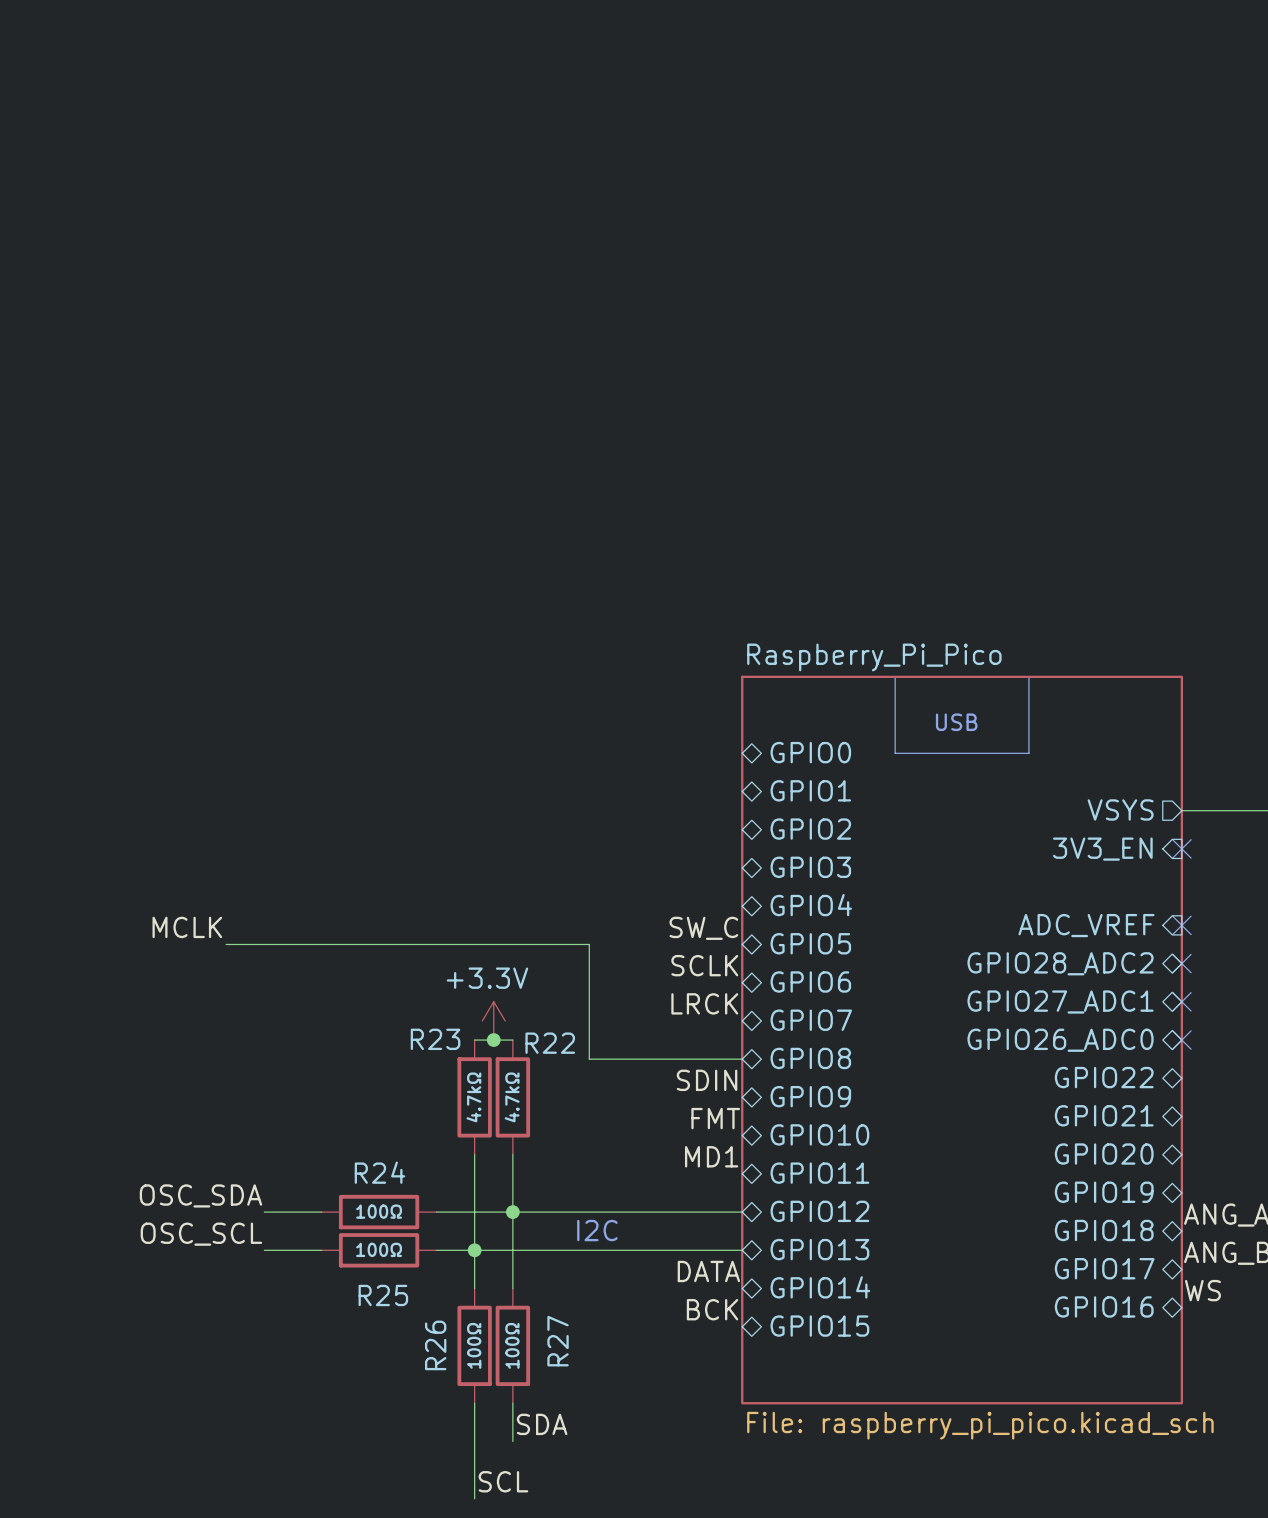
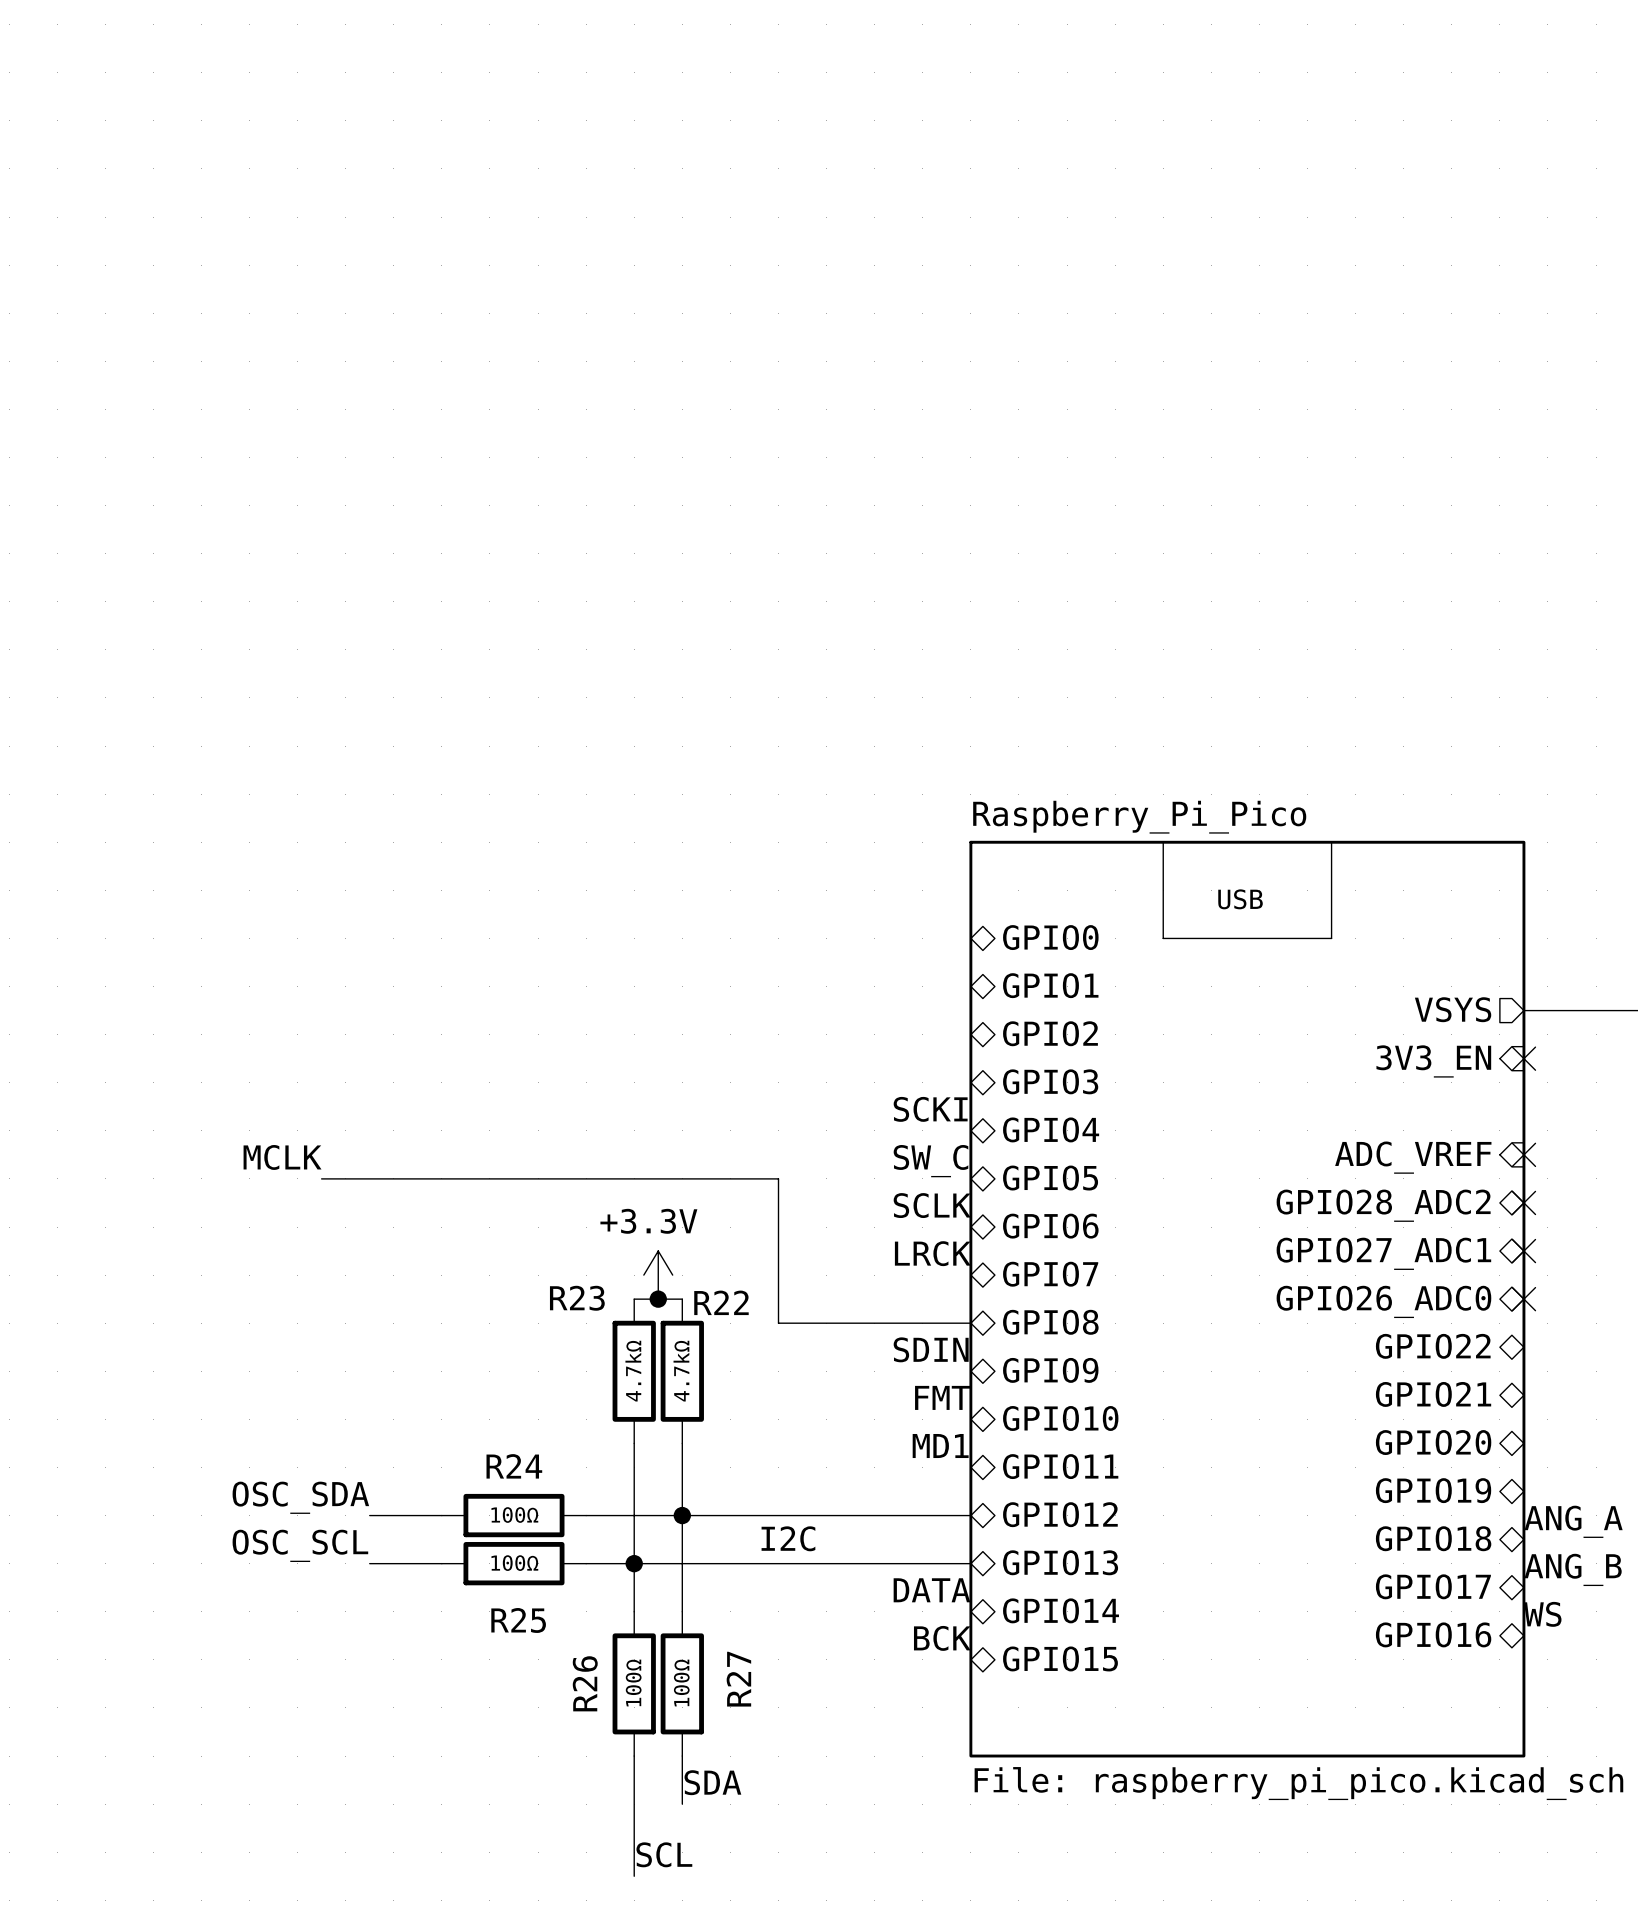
label: none -> SCKI (930, 1109)

